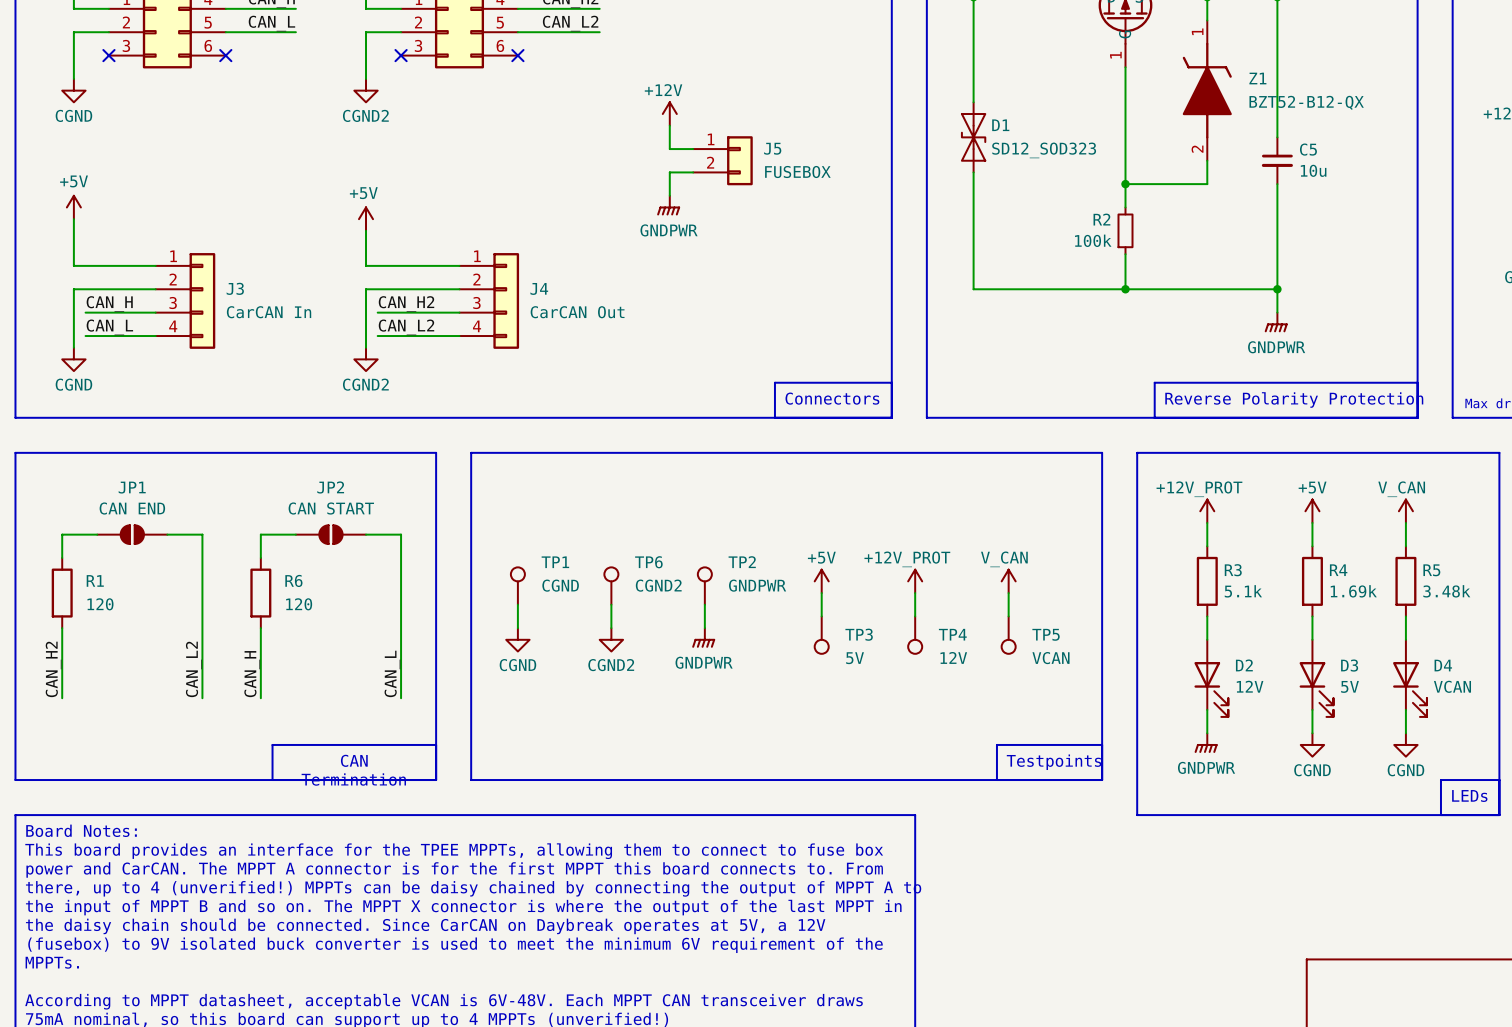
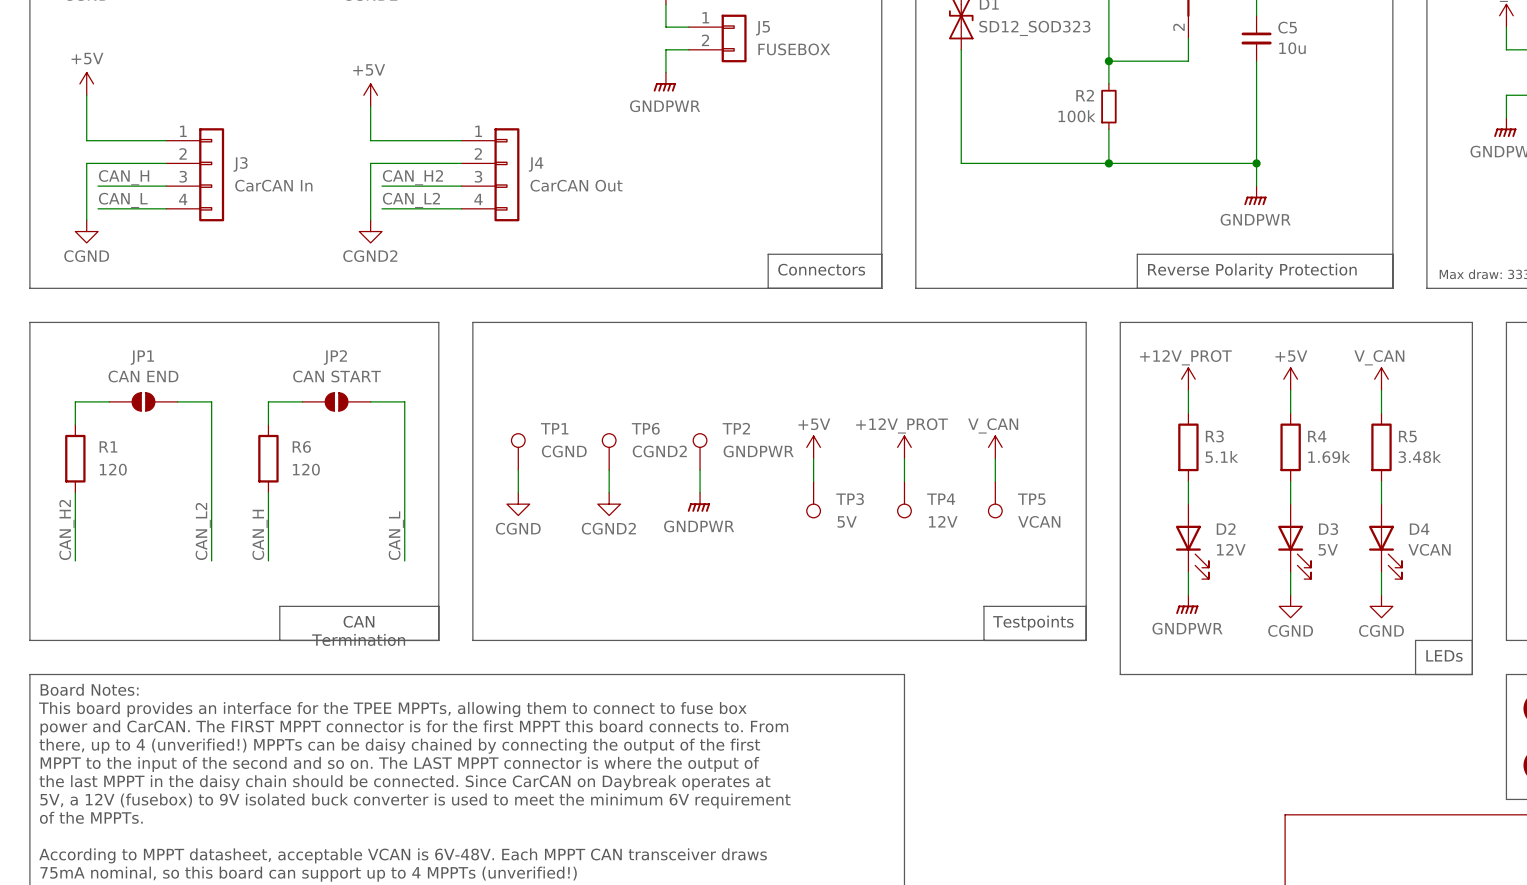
text: power and CarCAN. The MPPT A connector is for the first MPPT this board connects to. From (454, 869) -> power and CarCAN. The FIRST MPPT connector is for the first MPPT this board connects to. From (414, 727)
text: there, up to 4 (unverified!) MPPTs can be daisy chained by connecting the output of MPPT A to (473, 888) -> there, up to 4 (unverified!) MPPTs can be daisy chained by connecting the output of the first (399, 746)
text: the input of MPPT B and so on. The MPPT X connector is where the output of the last MPPT in (463, 907) -> MPPT to the input of the second and so on. The LAST MPPT connector is where the output of (399, 764)
text: the daisy chain should be connected. Since CarCAN on Daybreak operates at 5V, a 12V (425, 926) -> the last MPPT in the daisy chain should be connected. Since CarCAN on Daybreak operates at (404, 782)
text: (fusebox) to 9V isolated buck converter is used to meet the minimum 6V requirement of the (455, 945) -> 5V, a 12V (fusebox) to 9V isolated buck converter is used to meet the minimum 6V requirement (415, 801)
text: MPPTs. (52, 962) -> of the MPPTs. (91, 817)

